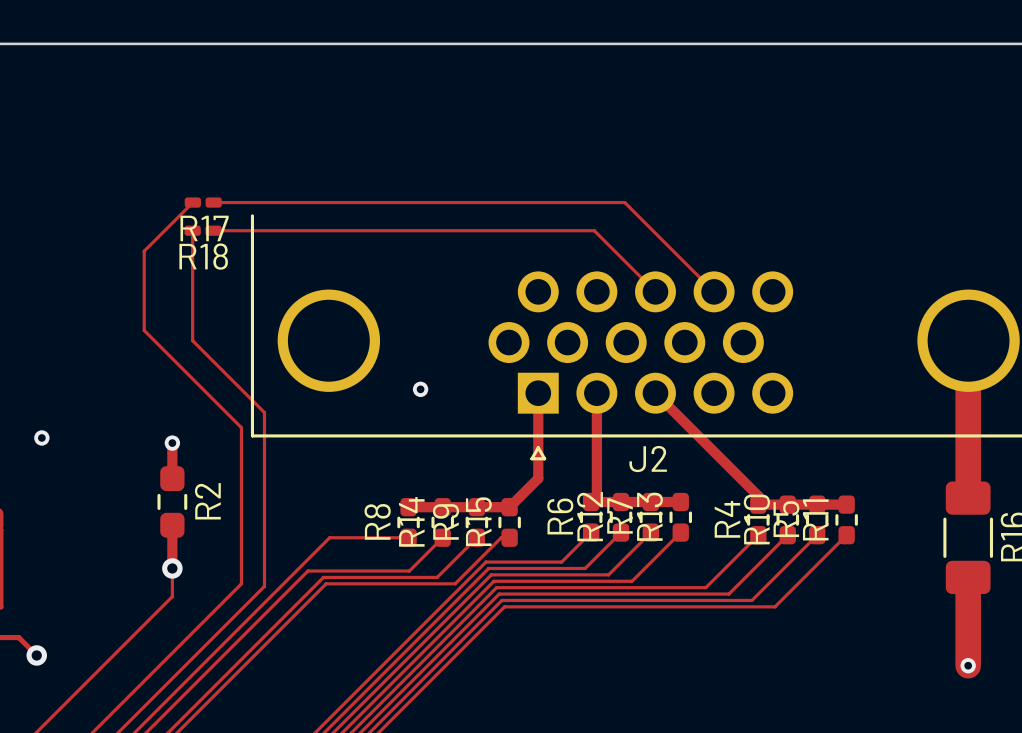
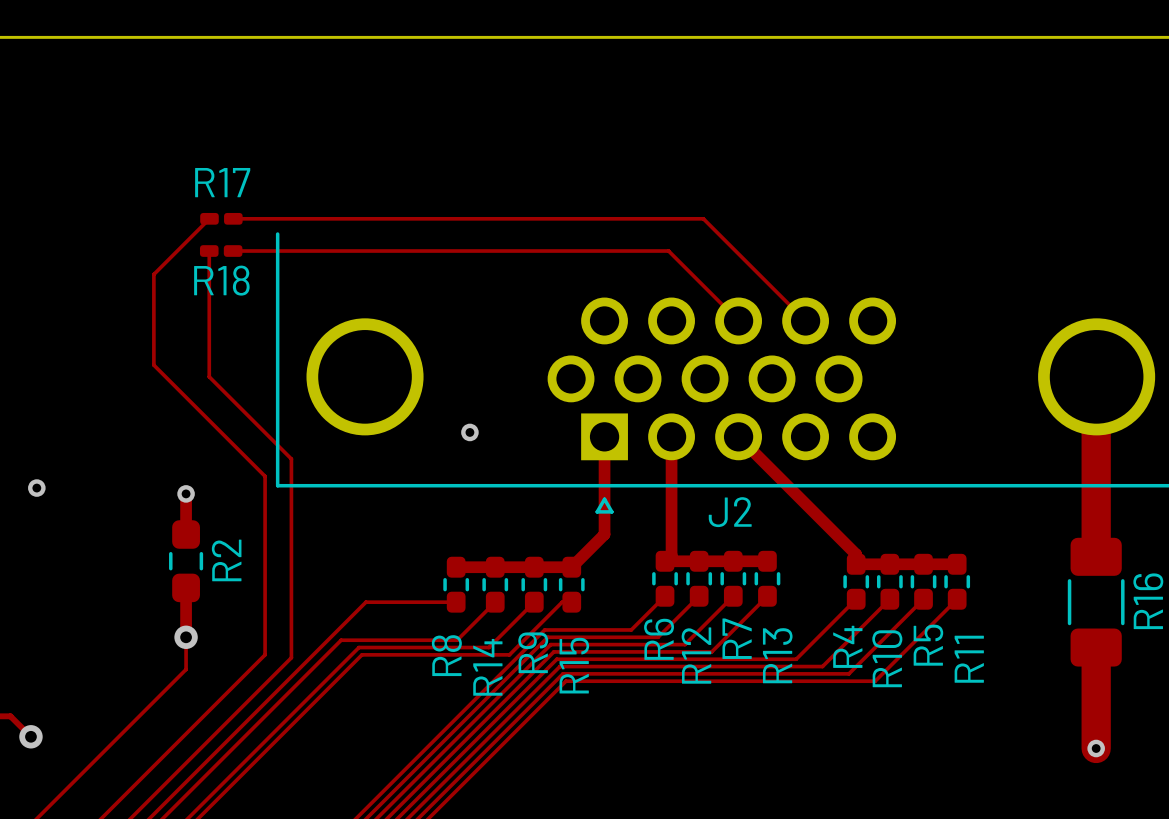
R17 name position: R17 (204, 228) -> R17 (222, 182)
R7 name position: R7 (619, 515) -> R7 (737, 638)
R6 name position: R6 (560, 516) -> R6 (659, 639)
R12 name position: R12 (589, 516) -> R12 (696, 655)
R13 name position: R13 (649, 516) -> R13 (777, 655)
R4 name position: R4 (727, 519) -> R4 (847, 646)
R10 name position: R10 (756, 519) -> R10 (887, 658)
R5 name position: R5 (786, 519) -> R5 (928, 645)
R11 name position: R11 (815, 519) -> R11 (969, 659)
R8 name position: R8 (377, 521) -> R8 (446, 655)
R14 name position: R14 (411, 521) -> R14 (487, 667)
R9 name position: R9 (446, 521) -> R9 (533, 652)
R15 name position: R15 (478, 521) -> R15 (574, 665)

